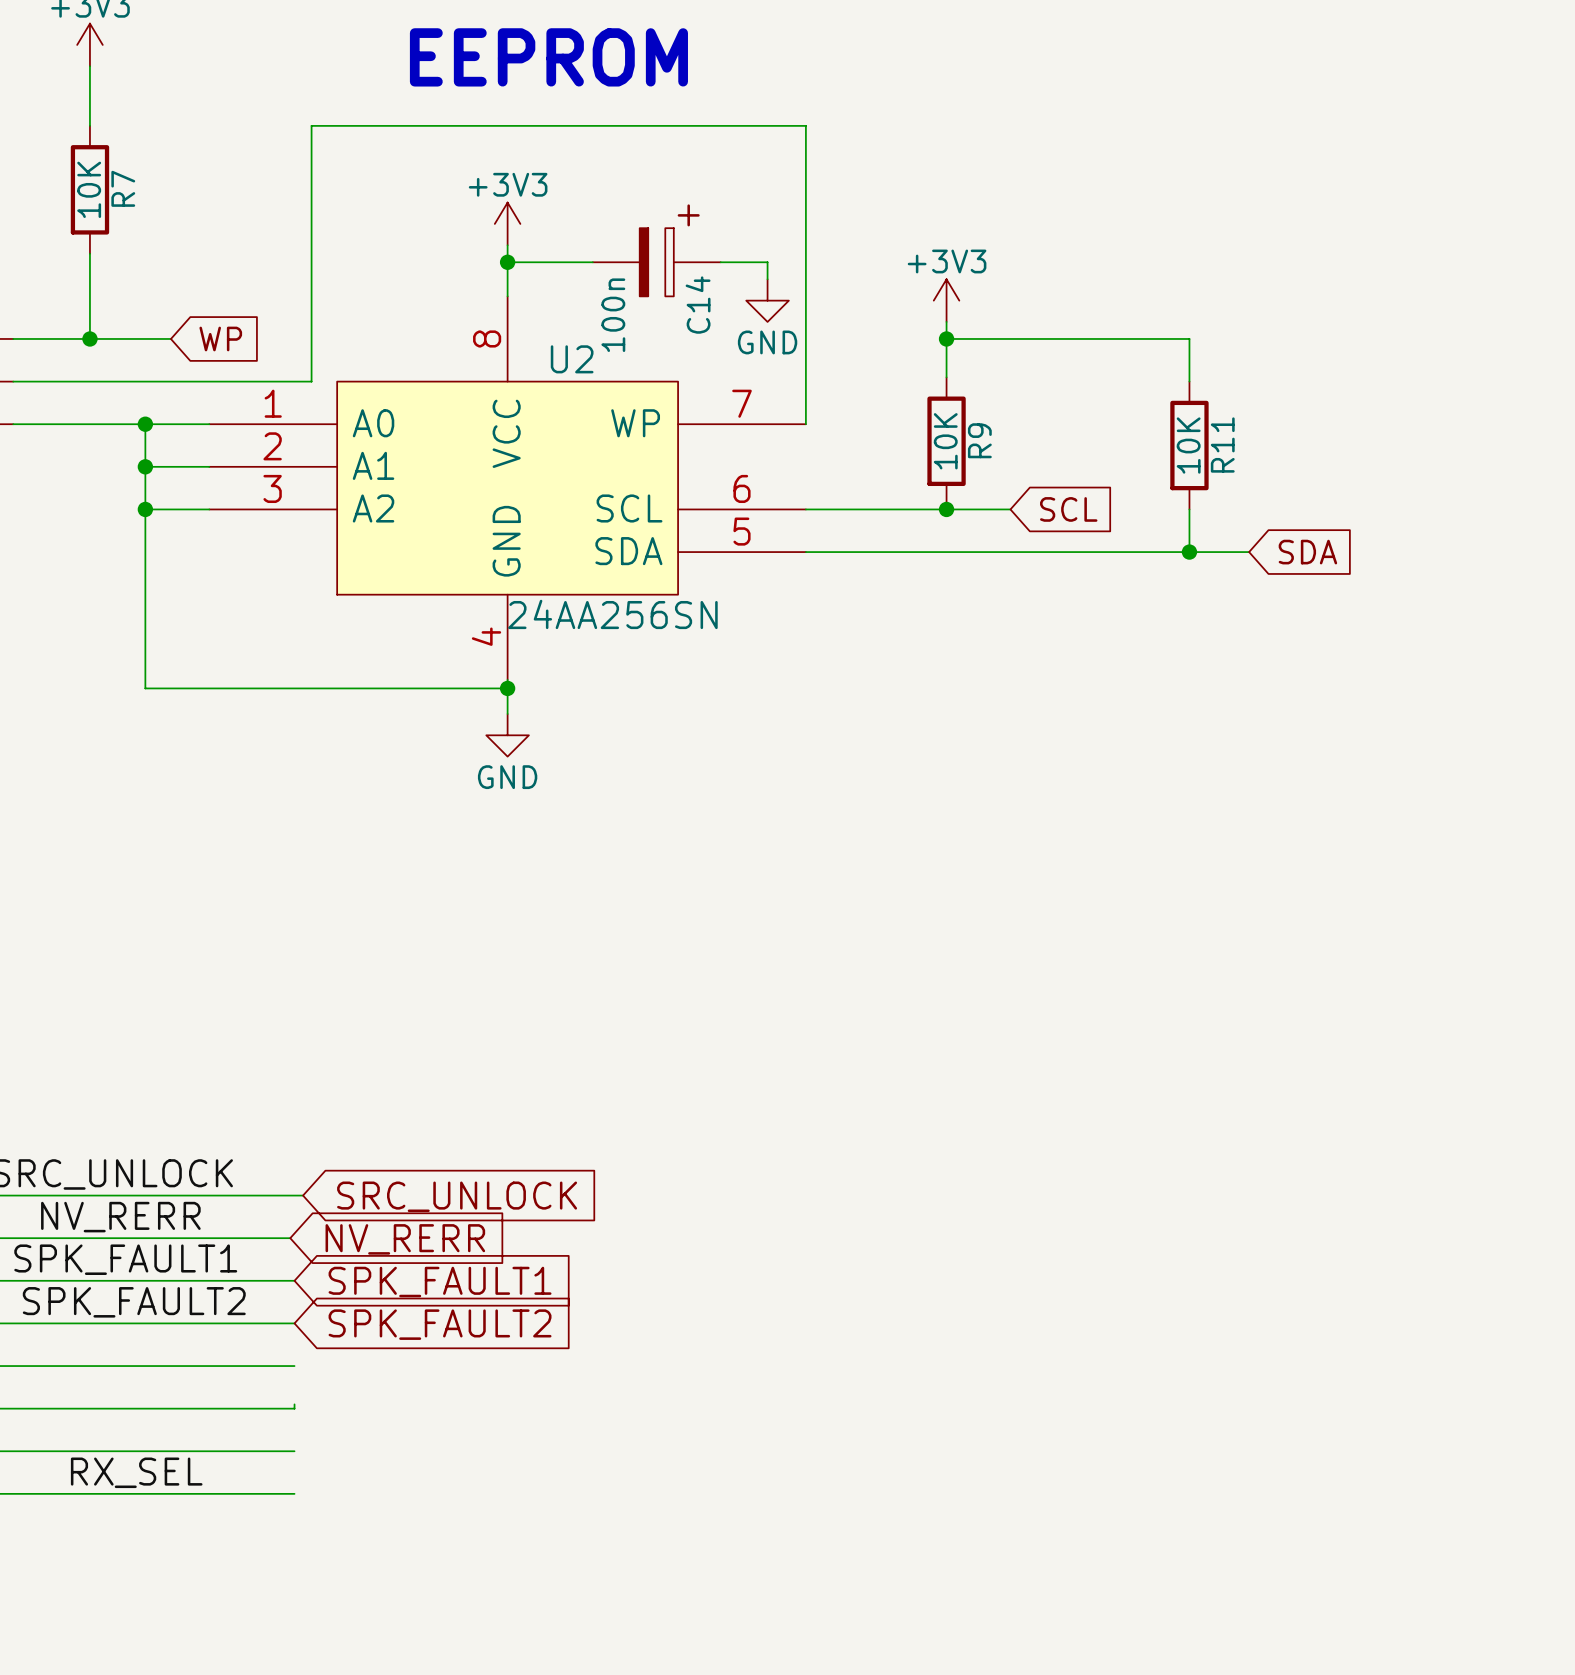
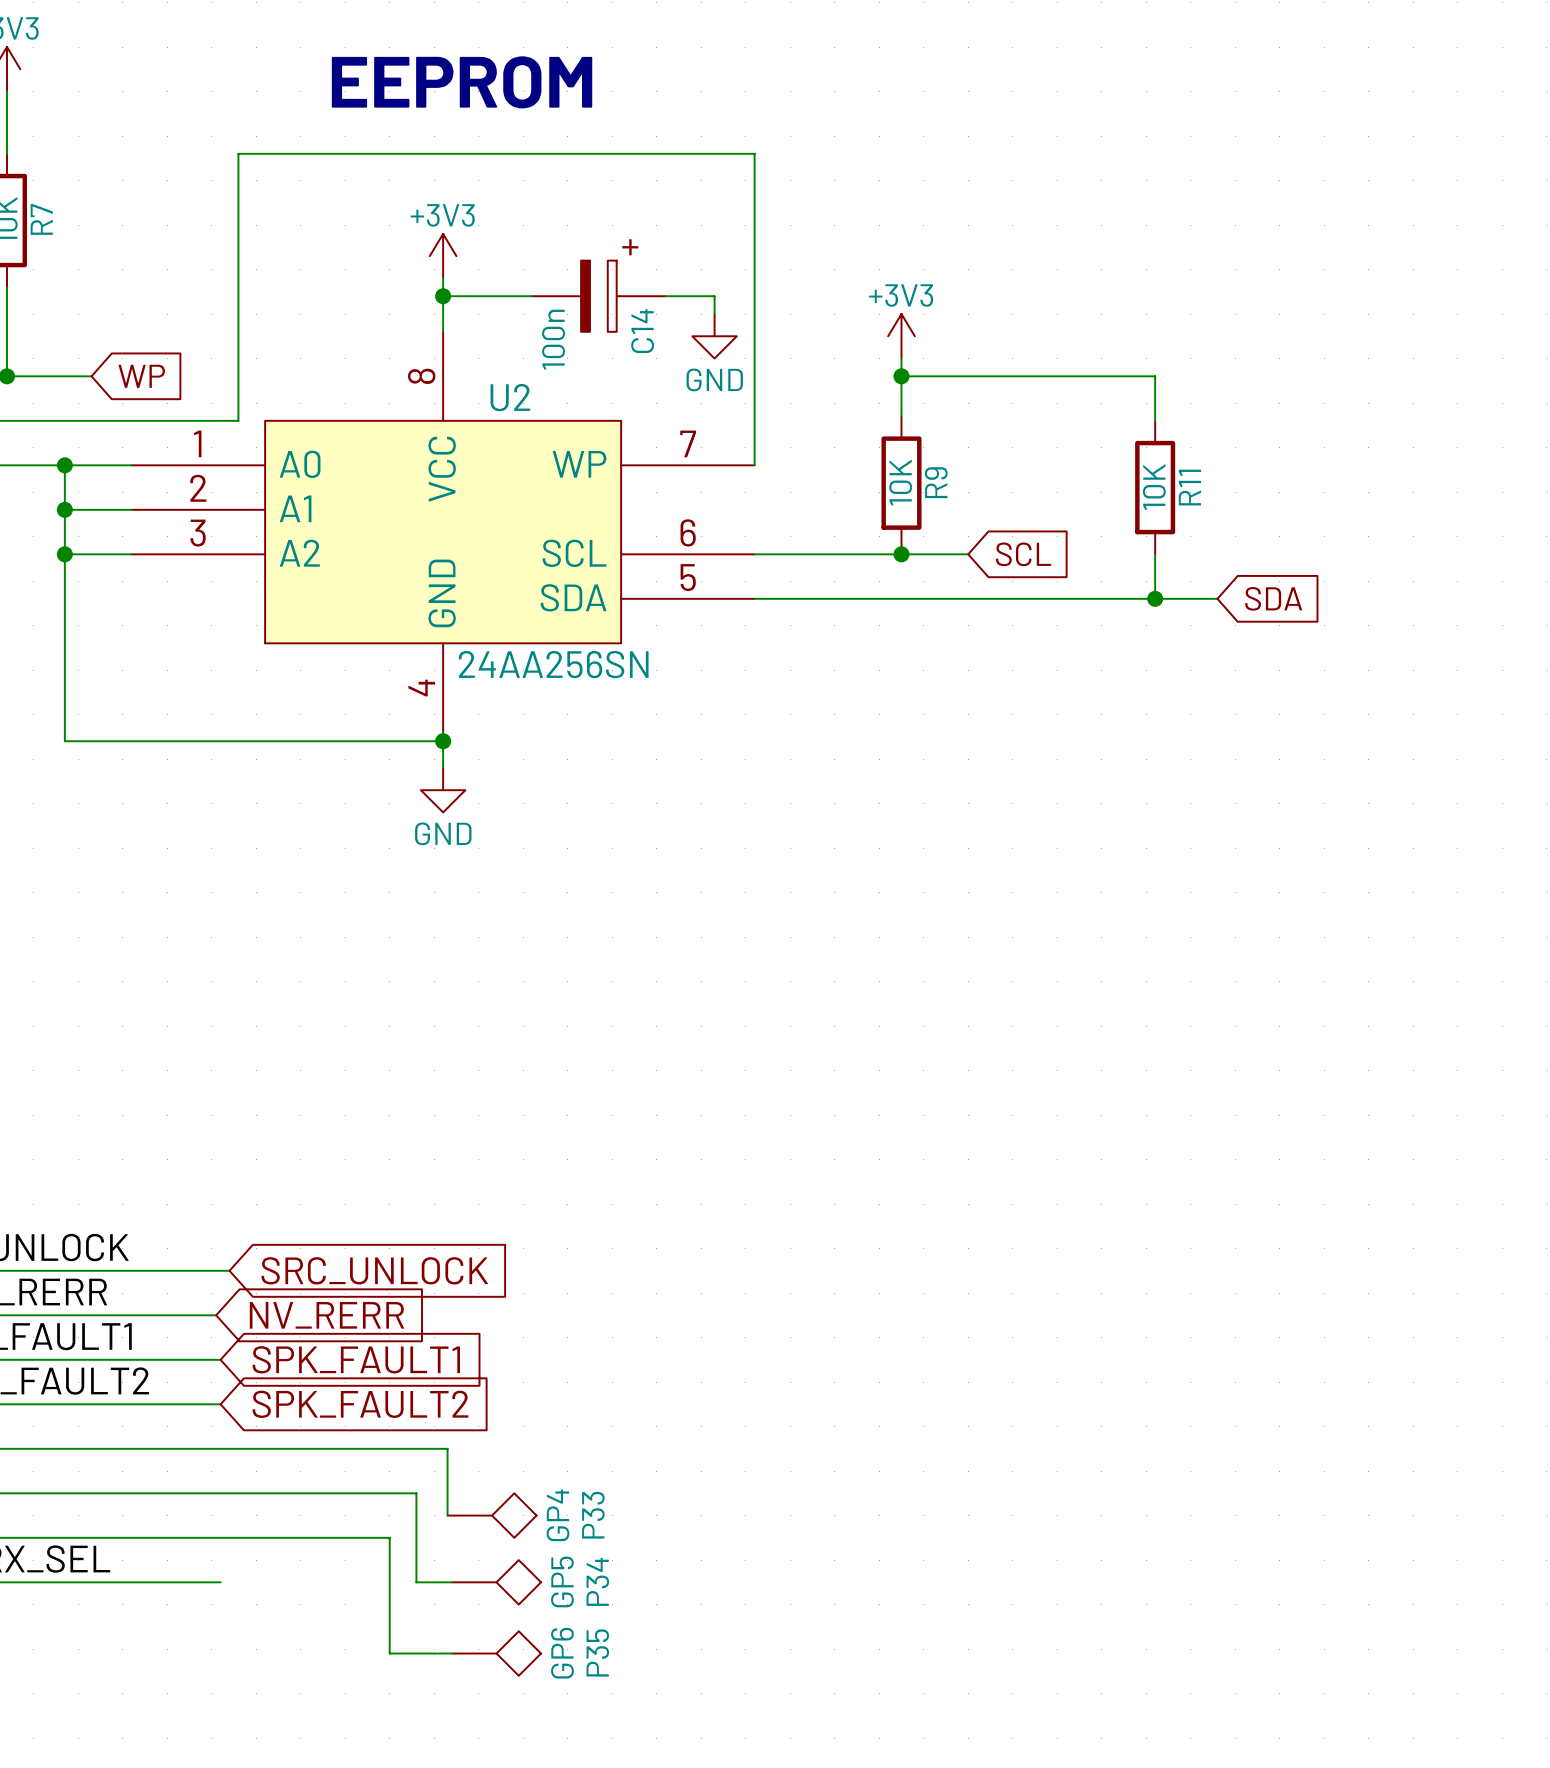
wire: none -> (220, 1448) (447, 1448) (447, 1515)
wire: (294, 1404) (294, 1408) -> (452, 1582) (416, 1582) (416, 1493) (220, 1493)
P33: none -> GP4 (492, 1515)
wire: none -> (220, 1537) (389, 1537) (389, 1653) (452, 1653)
P34: none -> GP5 (496, 1582)
P35: none -> GP6 (496, 1653)

